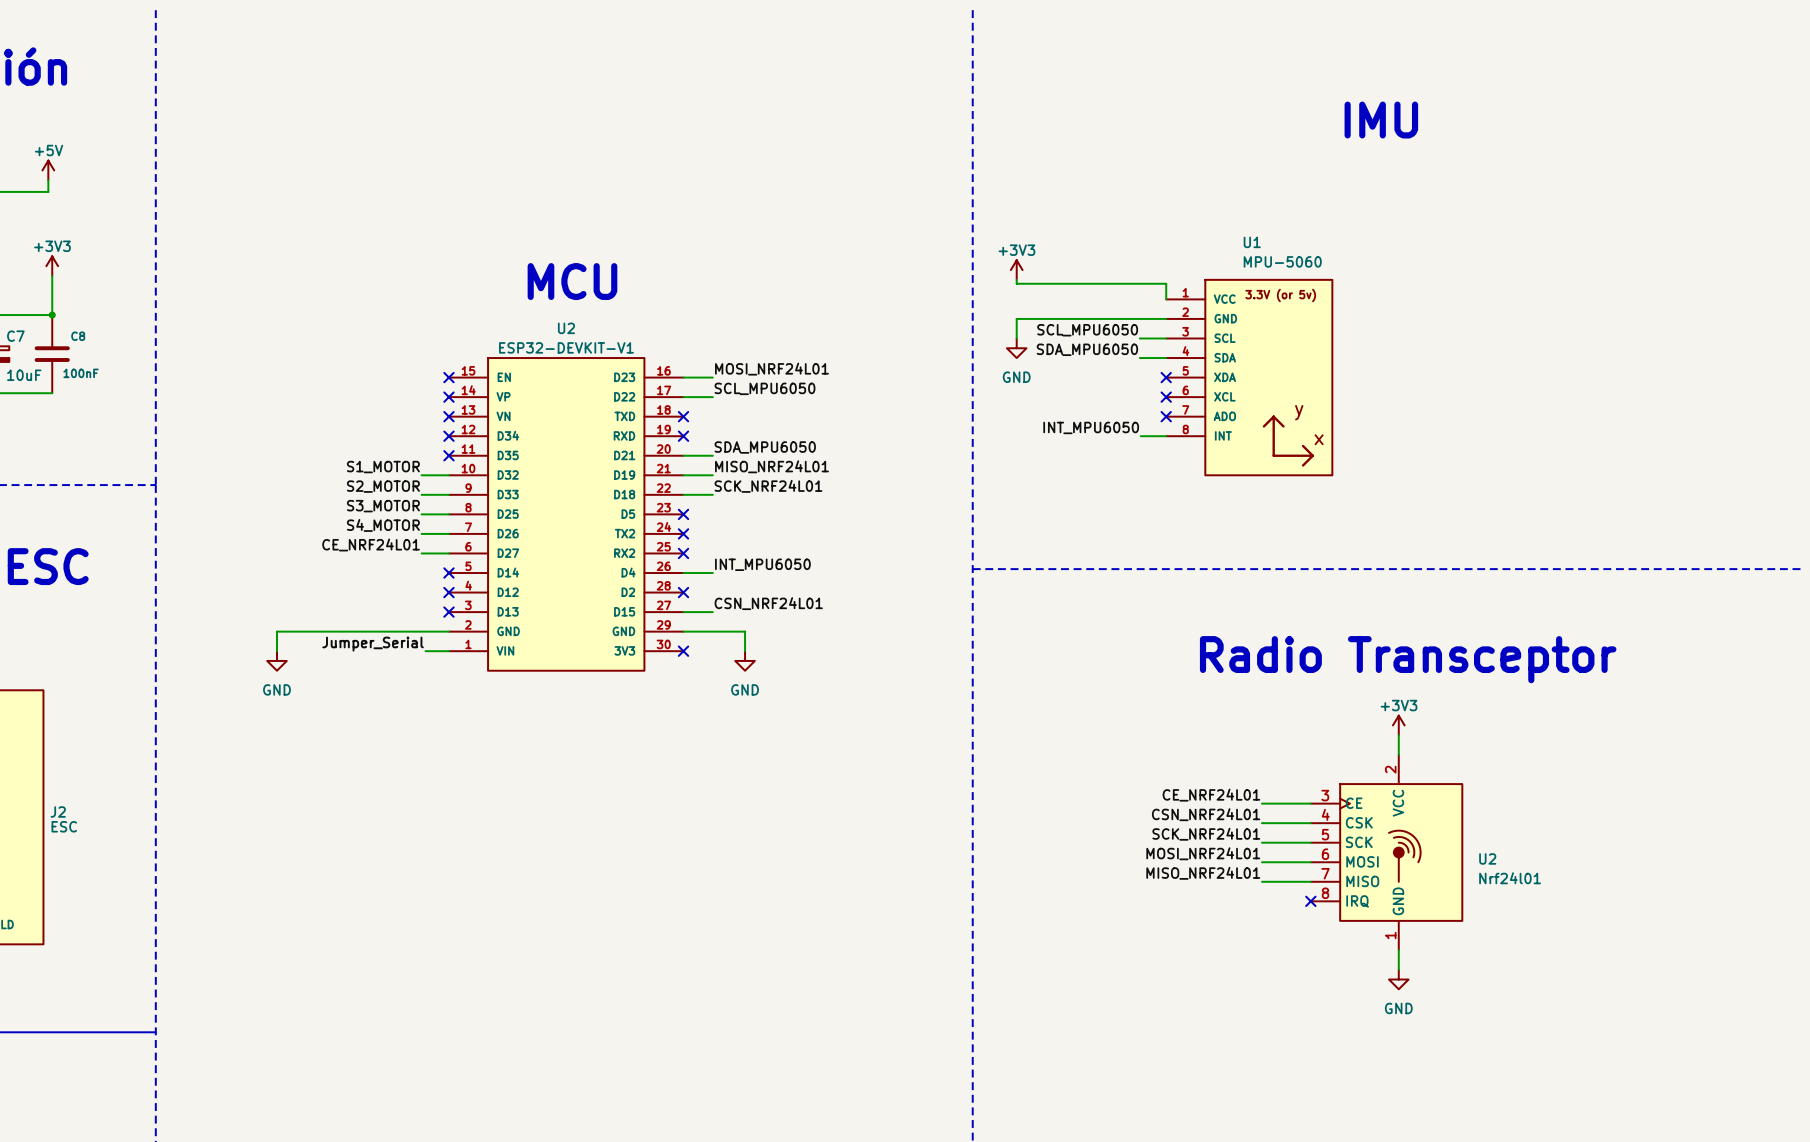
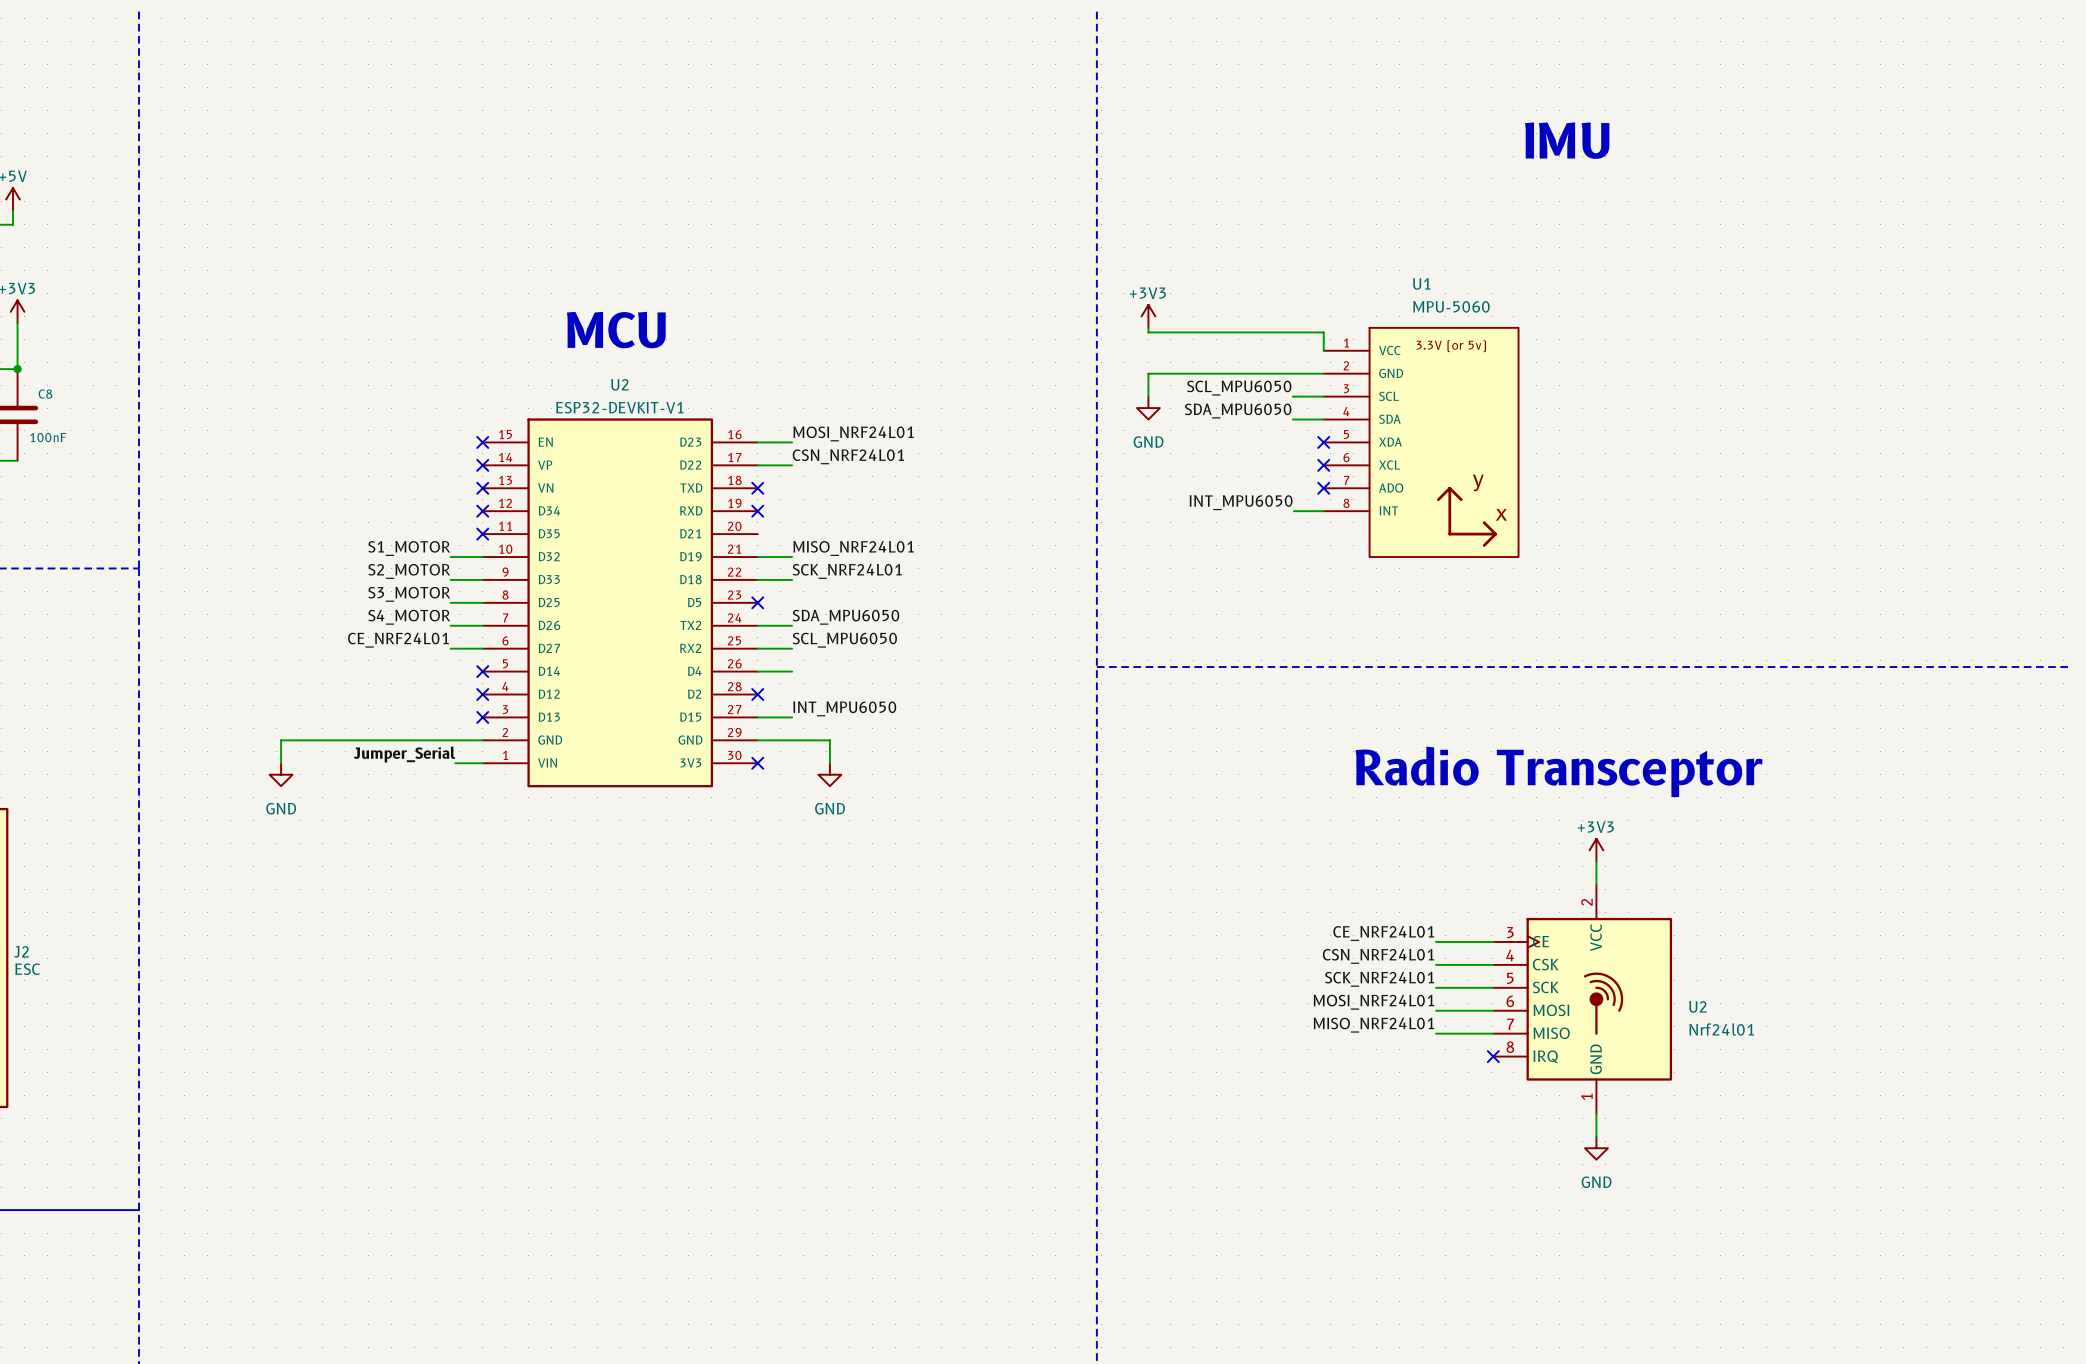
label: SCL_MPU6050 (765, 388) -> CSN_NRF24L01 (848, 456)
label position: SDA_MPU6050 (765, 447) -> SDA_MPU6050 (845, 617)
wire: (683, 455) (712, 455) -> (757, 625) (792, 625)
no-connect mark: (683, 533) -> none
wire: none -> (757, 648) (792, 648)
no-connect mark: (683, 553) -> none
label: INT_MPU6050 (762, 564) -> SCL_MPU6050 (844, 640)
label: CSN_NRF24L01 (768, 603) -> INT_MPU6050 (844, 708)

